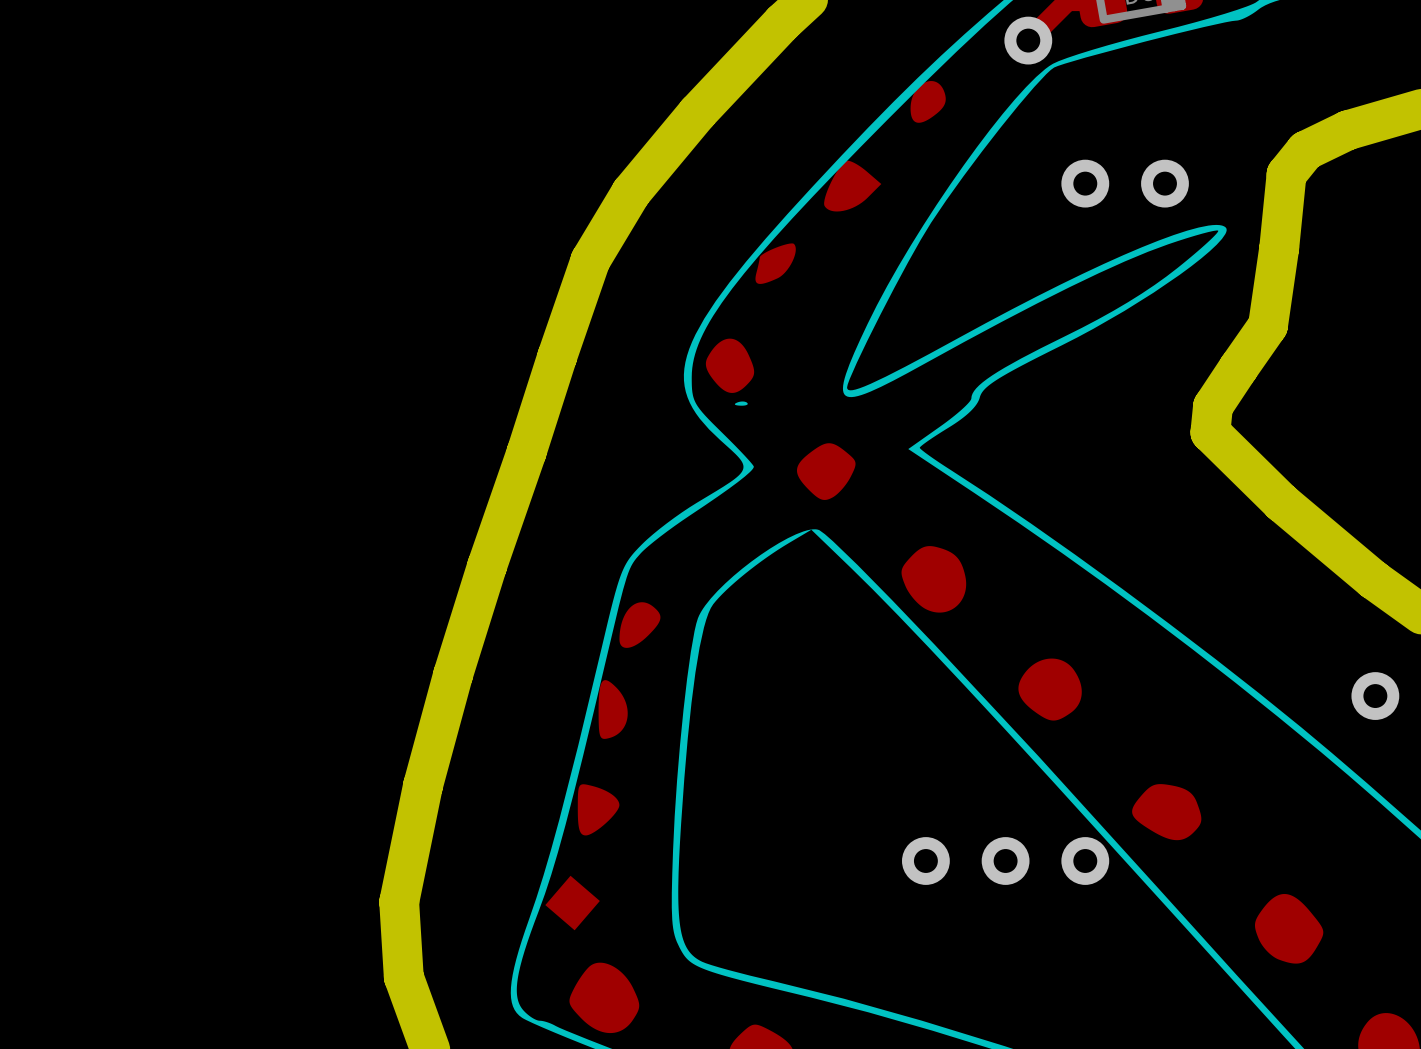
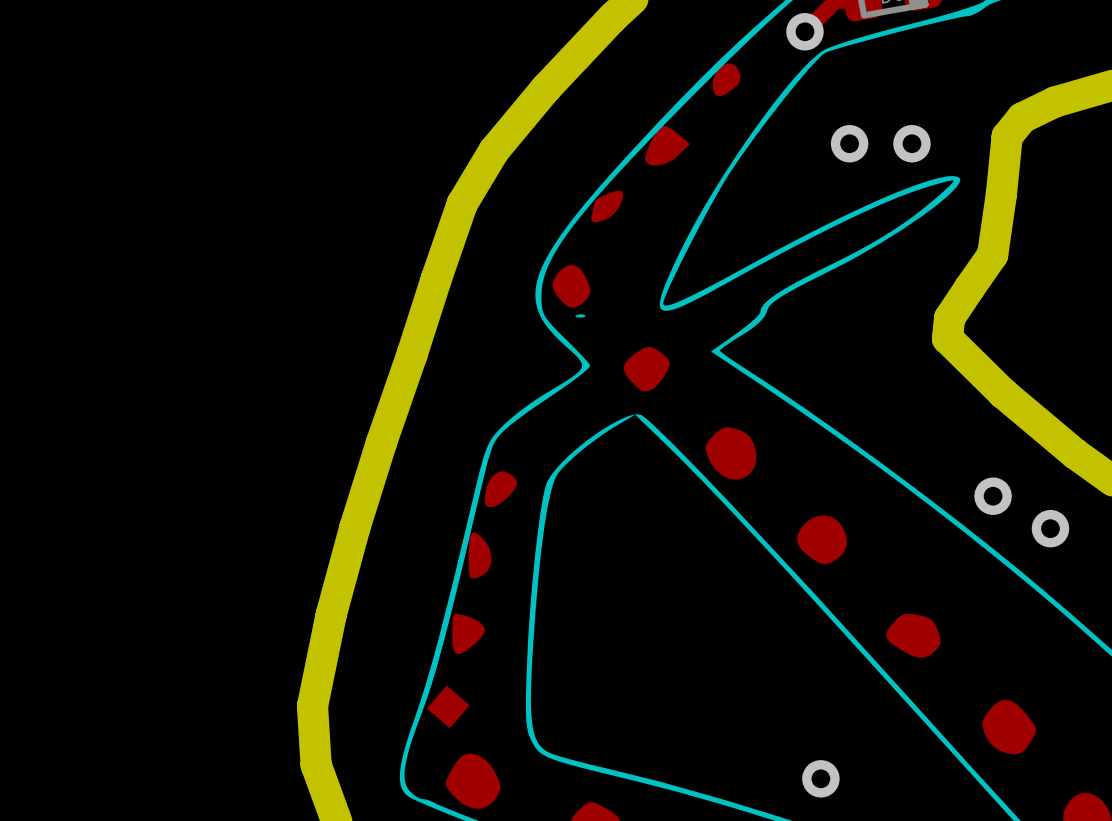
via: none -> (993, 496)
via position: (1375, 696) -> (1050, 528)
via: (925, 861) -> none
via: (1005, 861) -> none
via: (1085, 861) -> none
via: none -> (820, 778)

